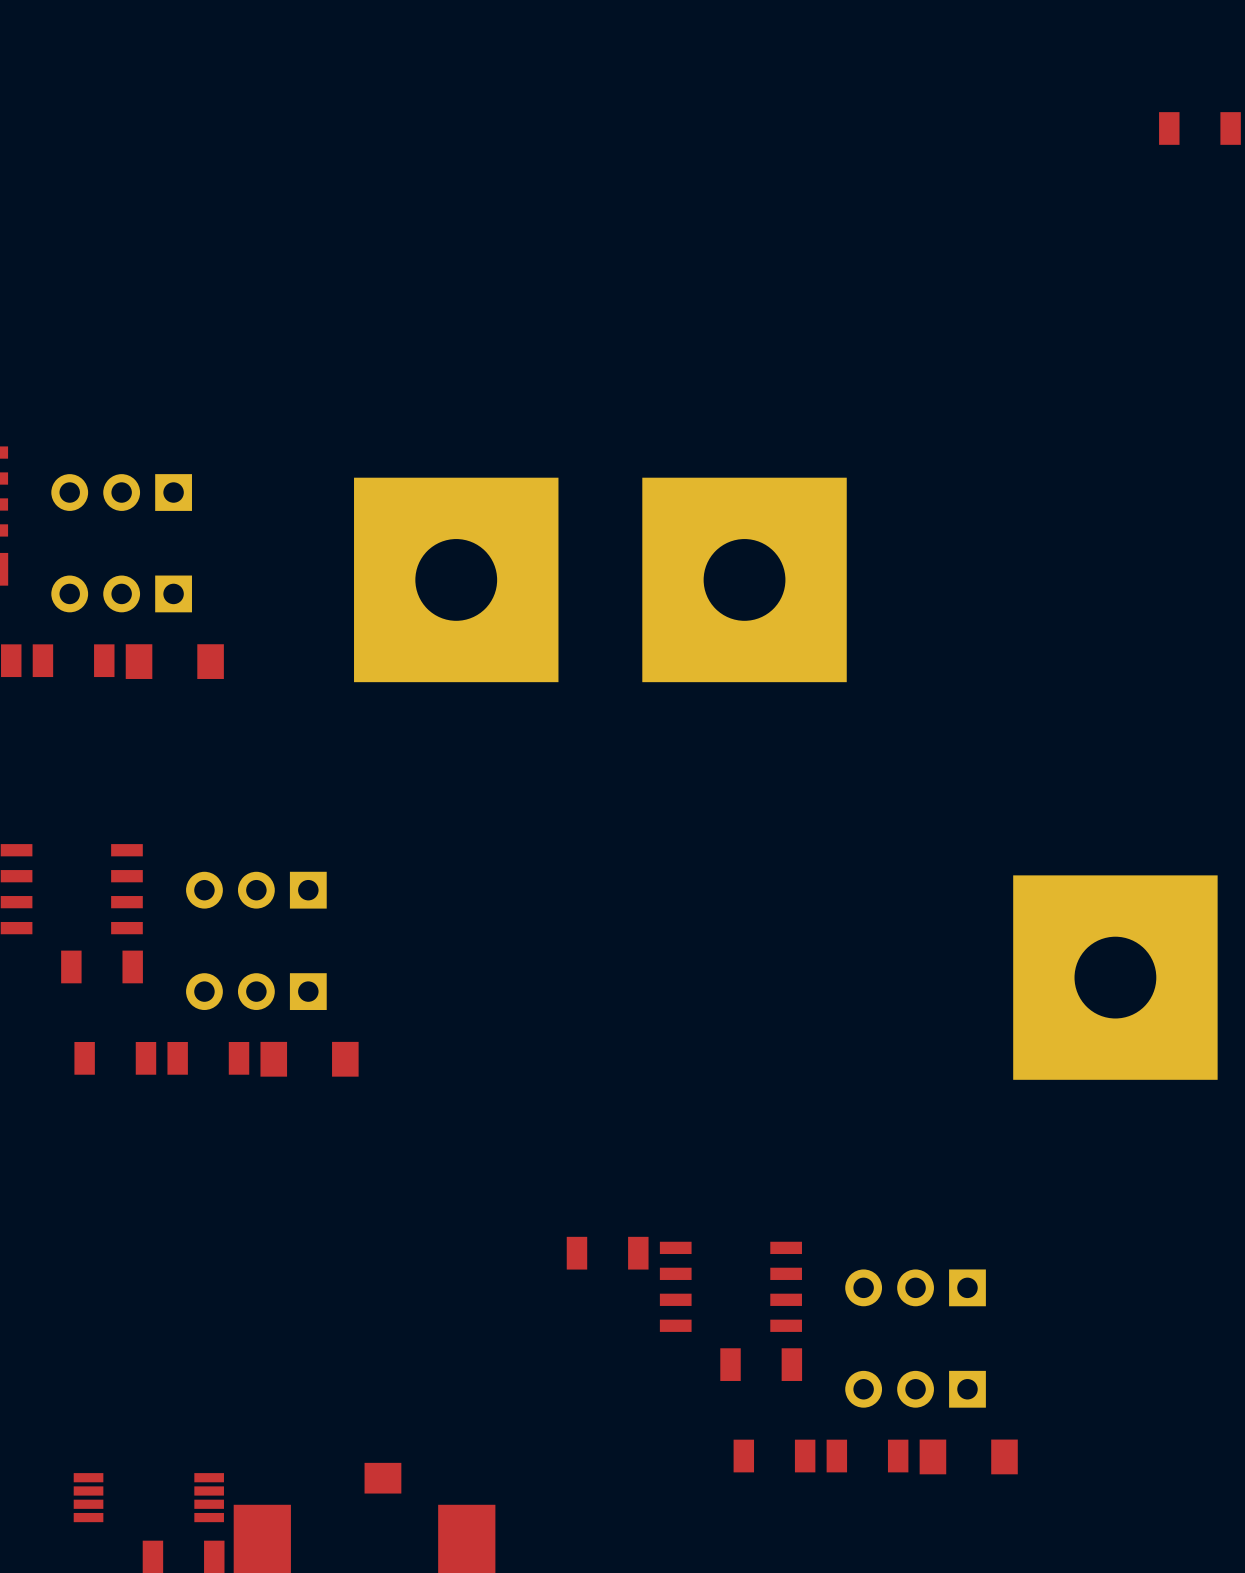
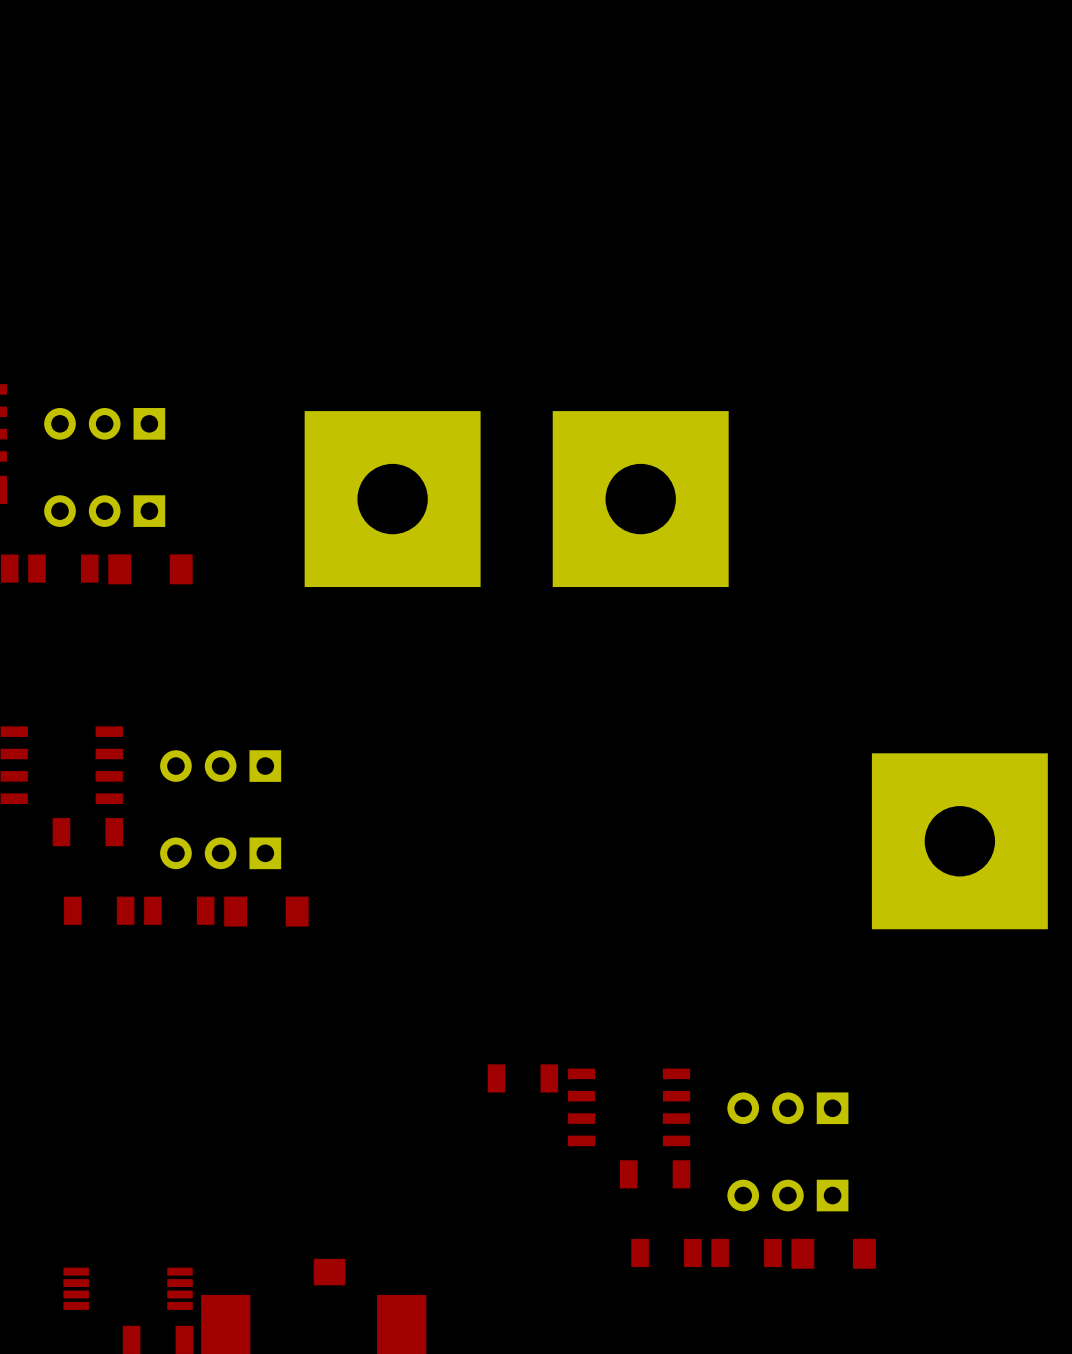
part: (1199, 128) -> none

